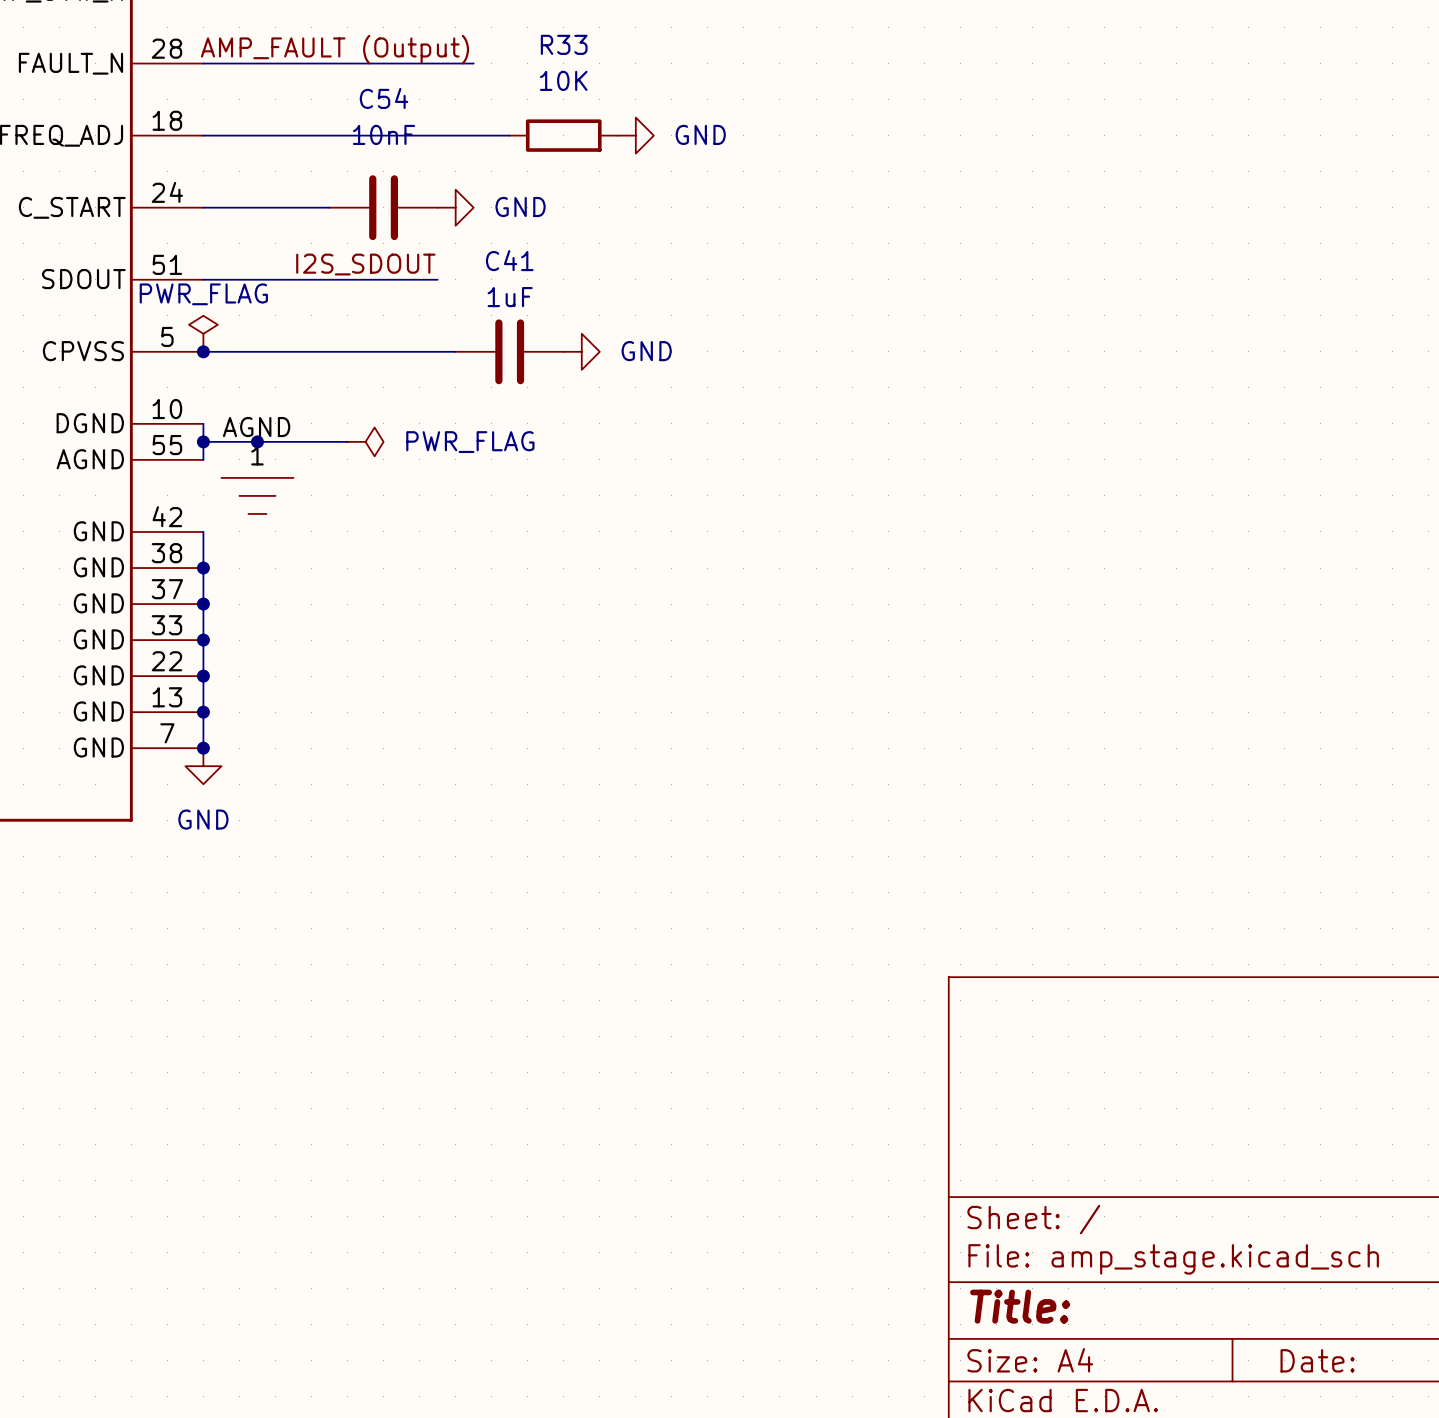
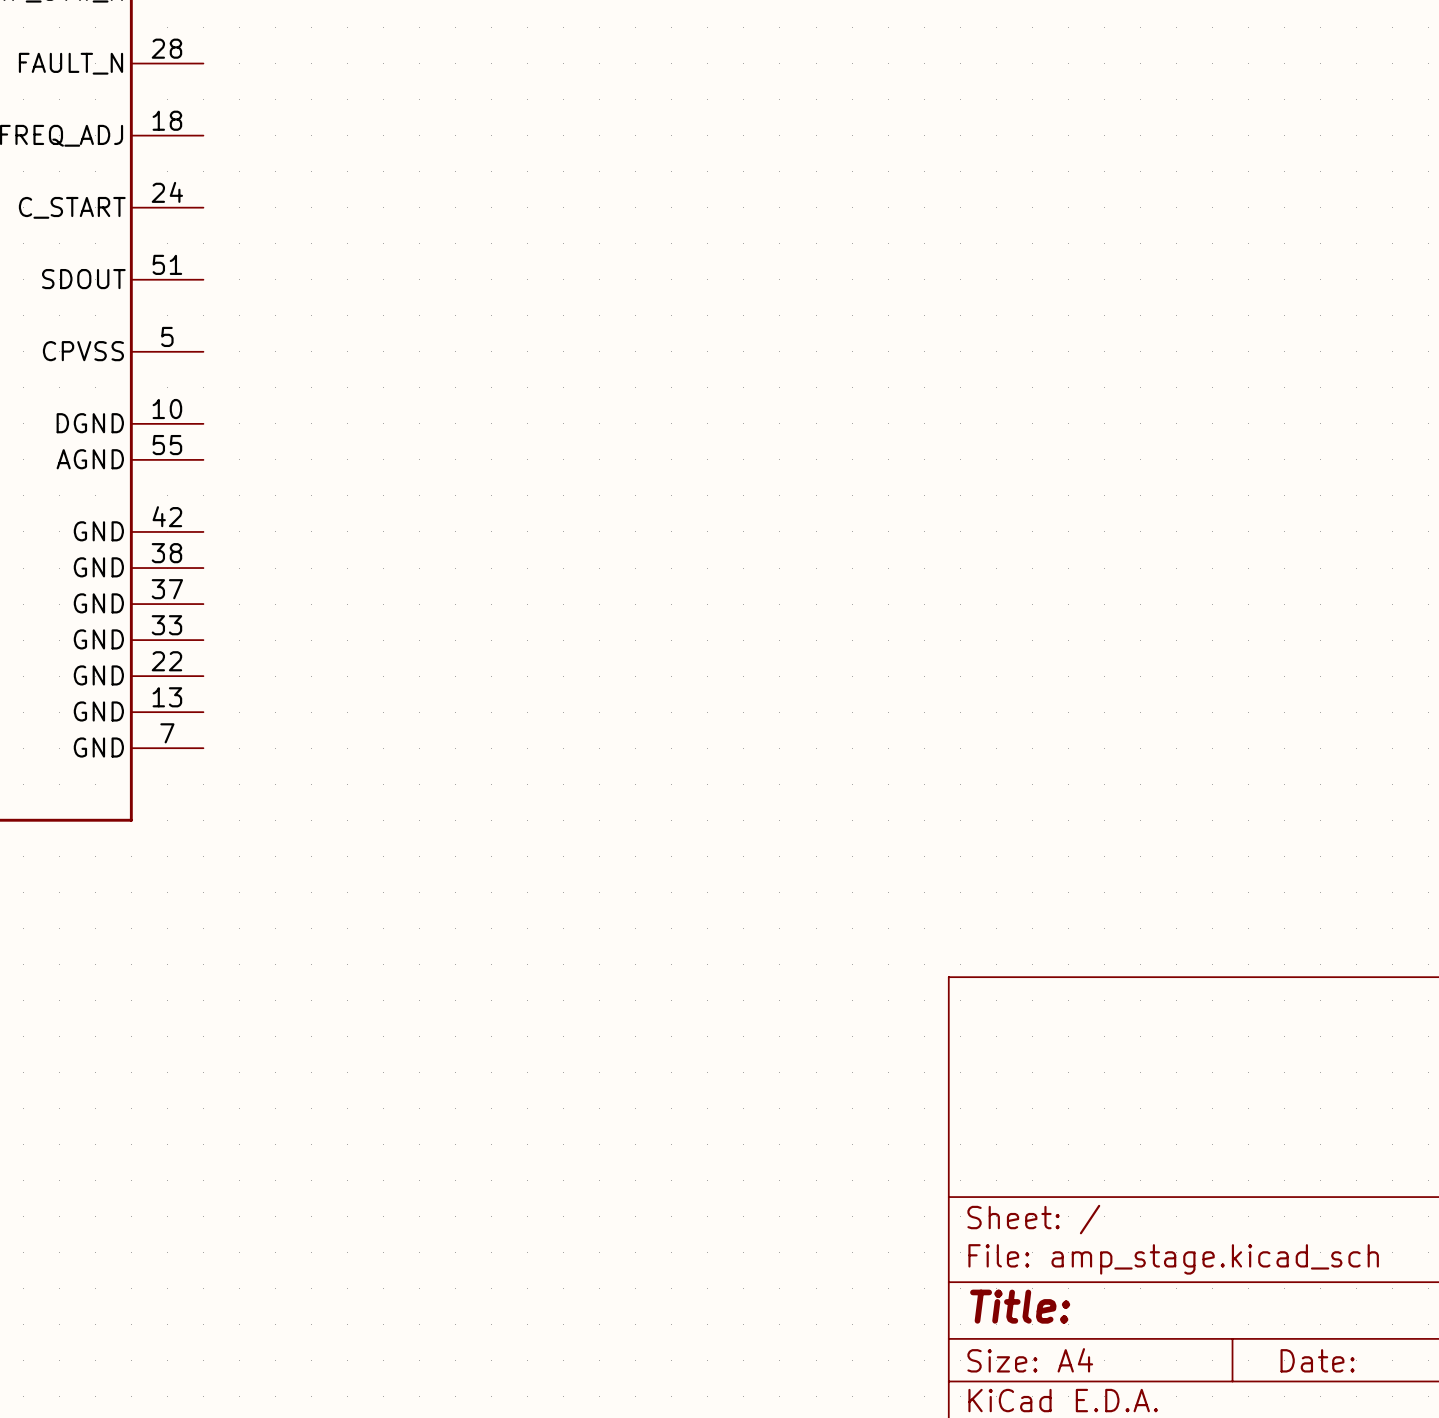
label: AMP_FAULT (Output) (334, 49) -> none
wire: (203, 63) (473, 63) -> none
wire: (203, 135) (509, 135) -> none
R33: 10K (563, 135) -> none
power symbol: GND (635, 135) -> none
wire: (203, 207) (329, 207) -> none
C54: 10nF (383, 207) -> none
power symbol: GND (455, 207) -> none
label: I2S_SDOUT (365, 264) -> none
wire: (203, 279) (437, 279) -> none
power symbol: PWR_FLAG (203, 333) -> none
wire: (203, 351) (455, 351) -> none
junction: (203, 351) -> none
C41: 1uF (509, 351) -> none
power symbol: GND (581, 351) -> none
wire: (203, 423) (203, 459) -> none
wire: (203, 441) (347, 441) -> none
junction: (203, 441) -> none
junction: (257, 441) -> none
power symbol: PWR_FLAG (365, 441) -> none
power symbol: (257, 495) -> none
wire: (203, 531) (203, 748) -> none
junction: (203, 568) -> none
junction: (203, 604) -> none
junction: (203, 640) -> none
junction: (203, 676) -> none
junction: (203, 712) -> none
junction: (203, 748) -> none
power symbol: GND (203, 766) -> none

